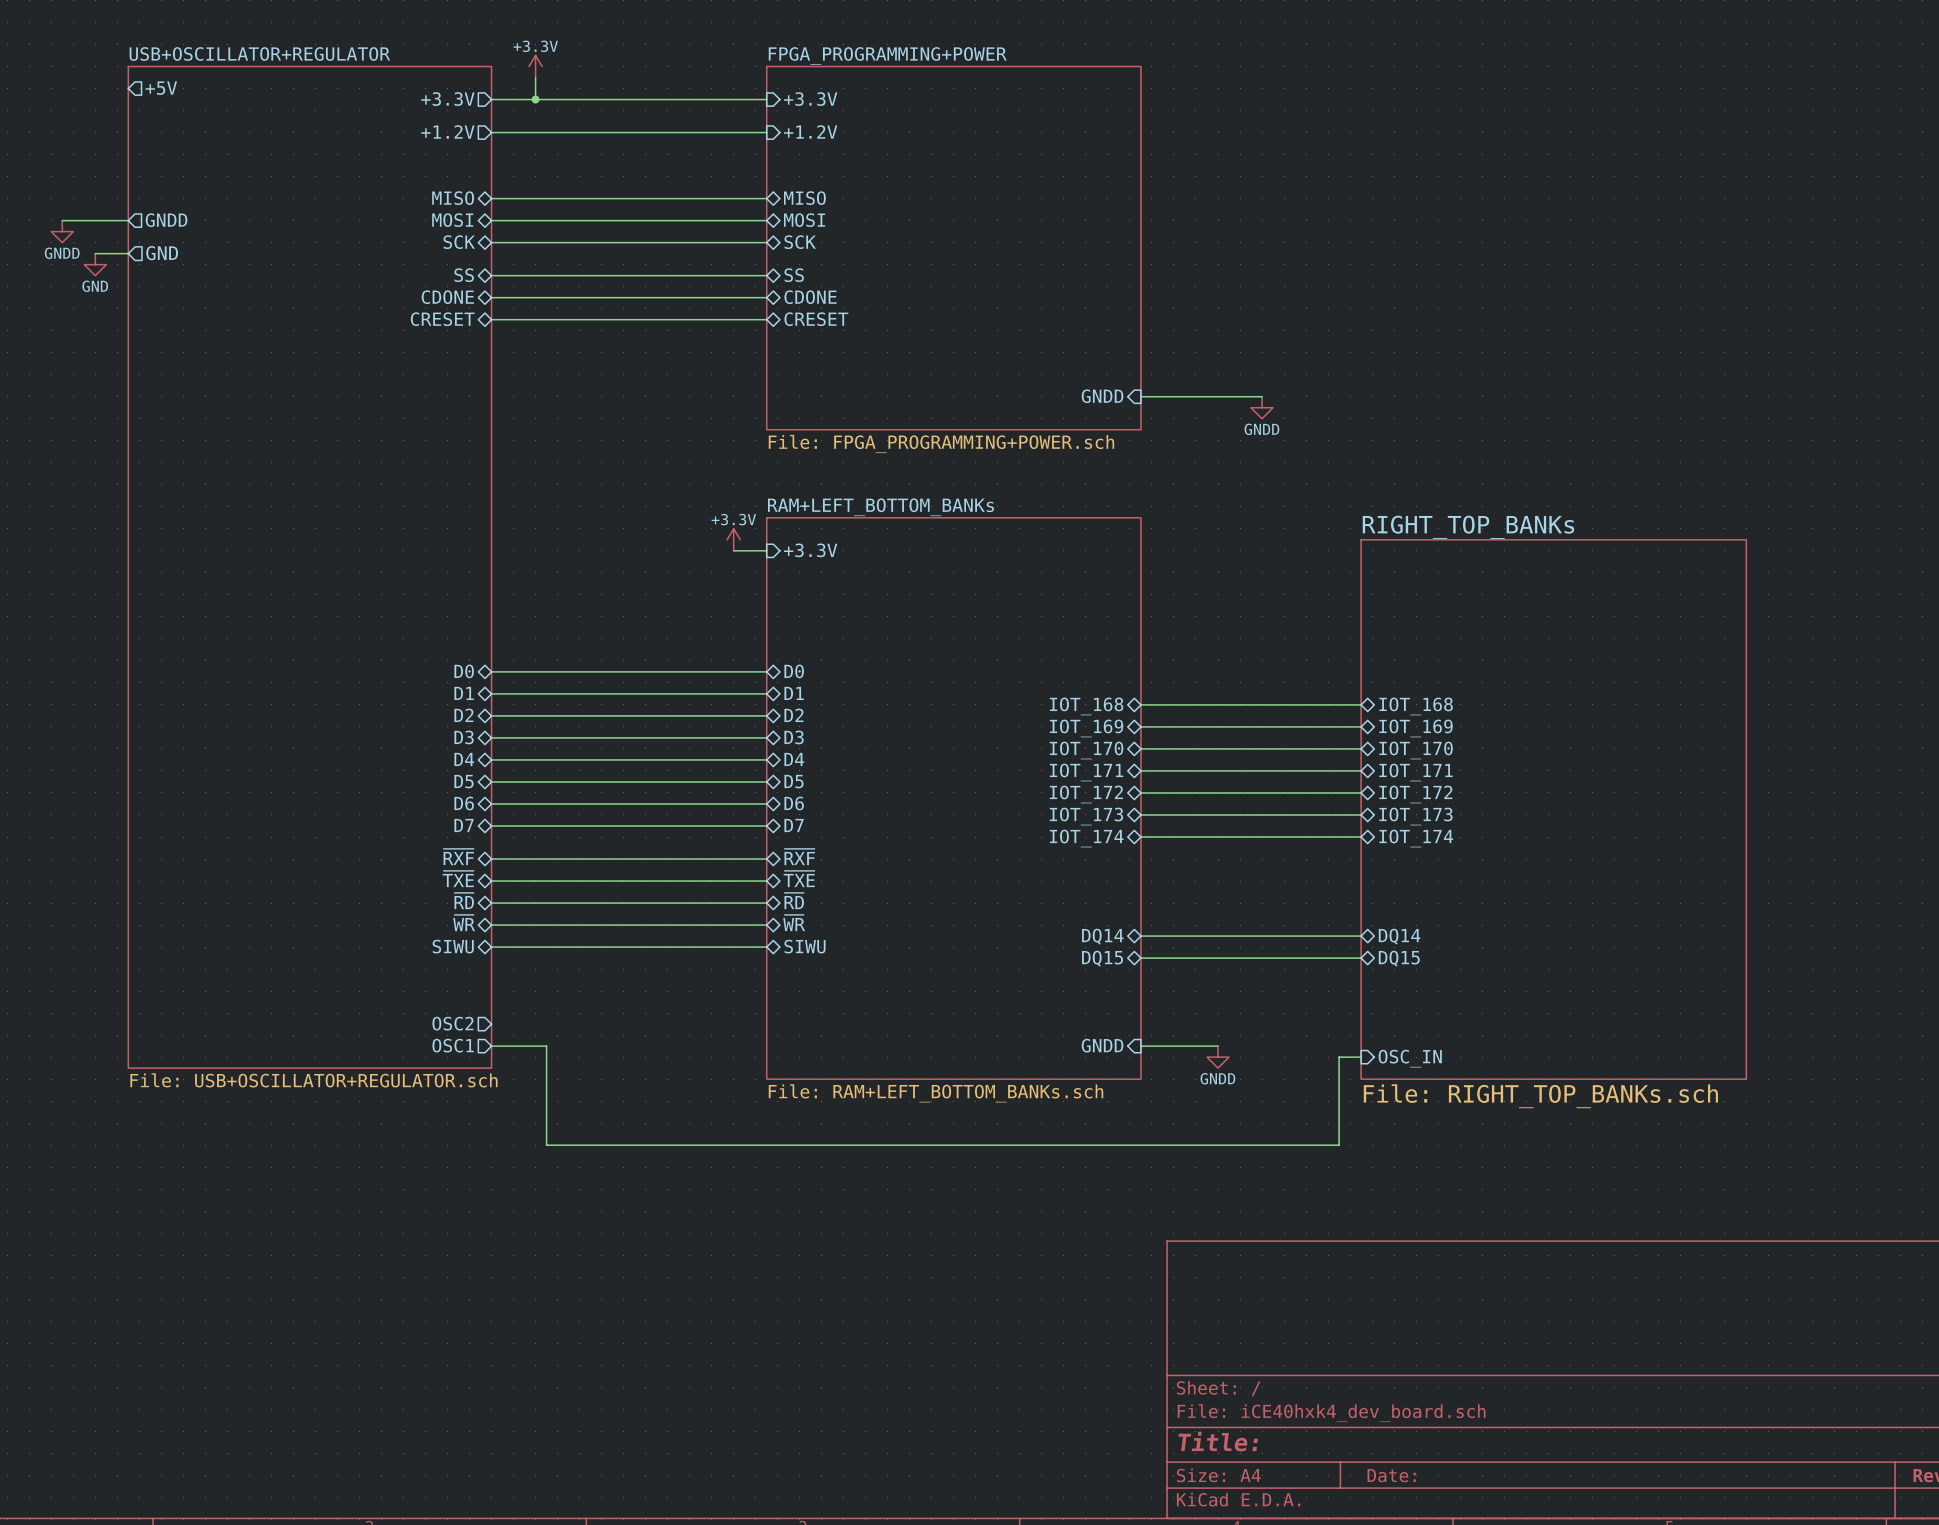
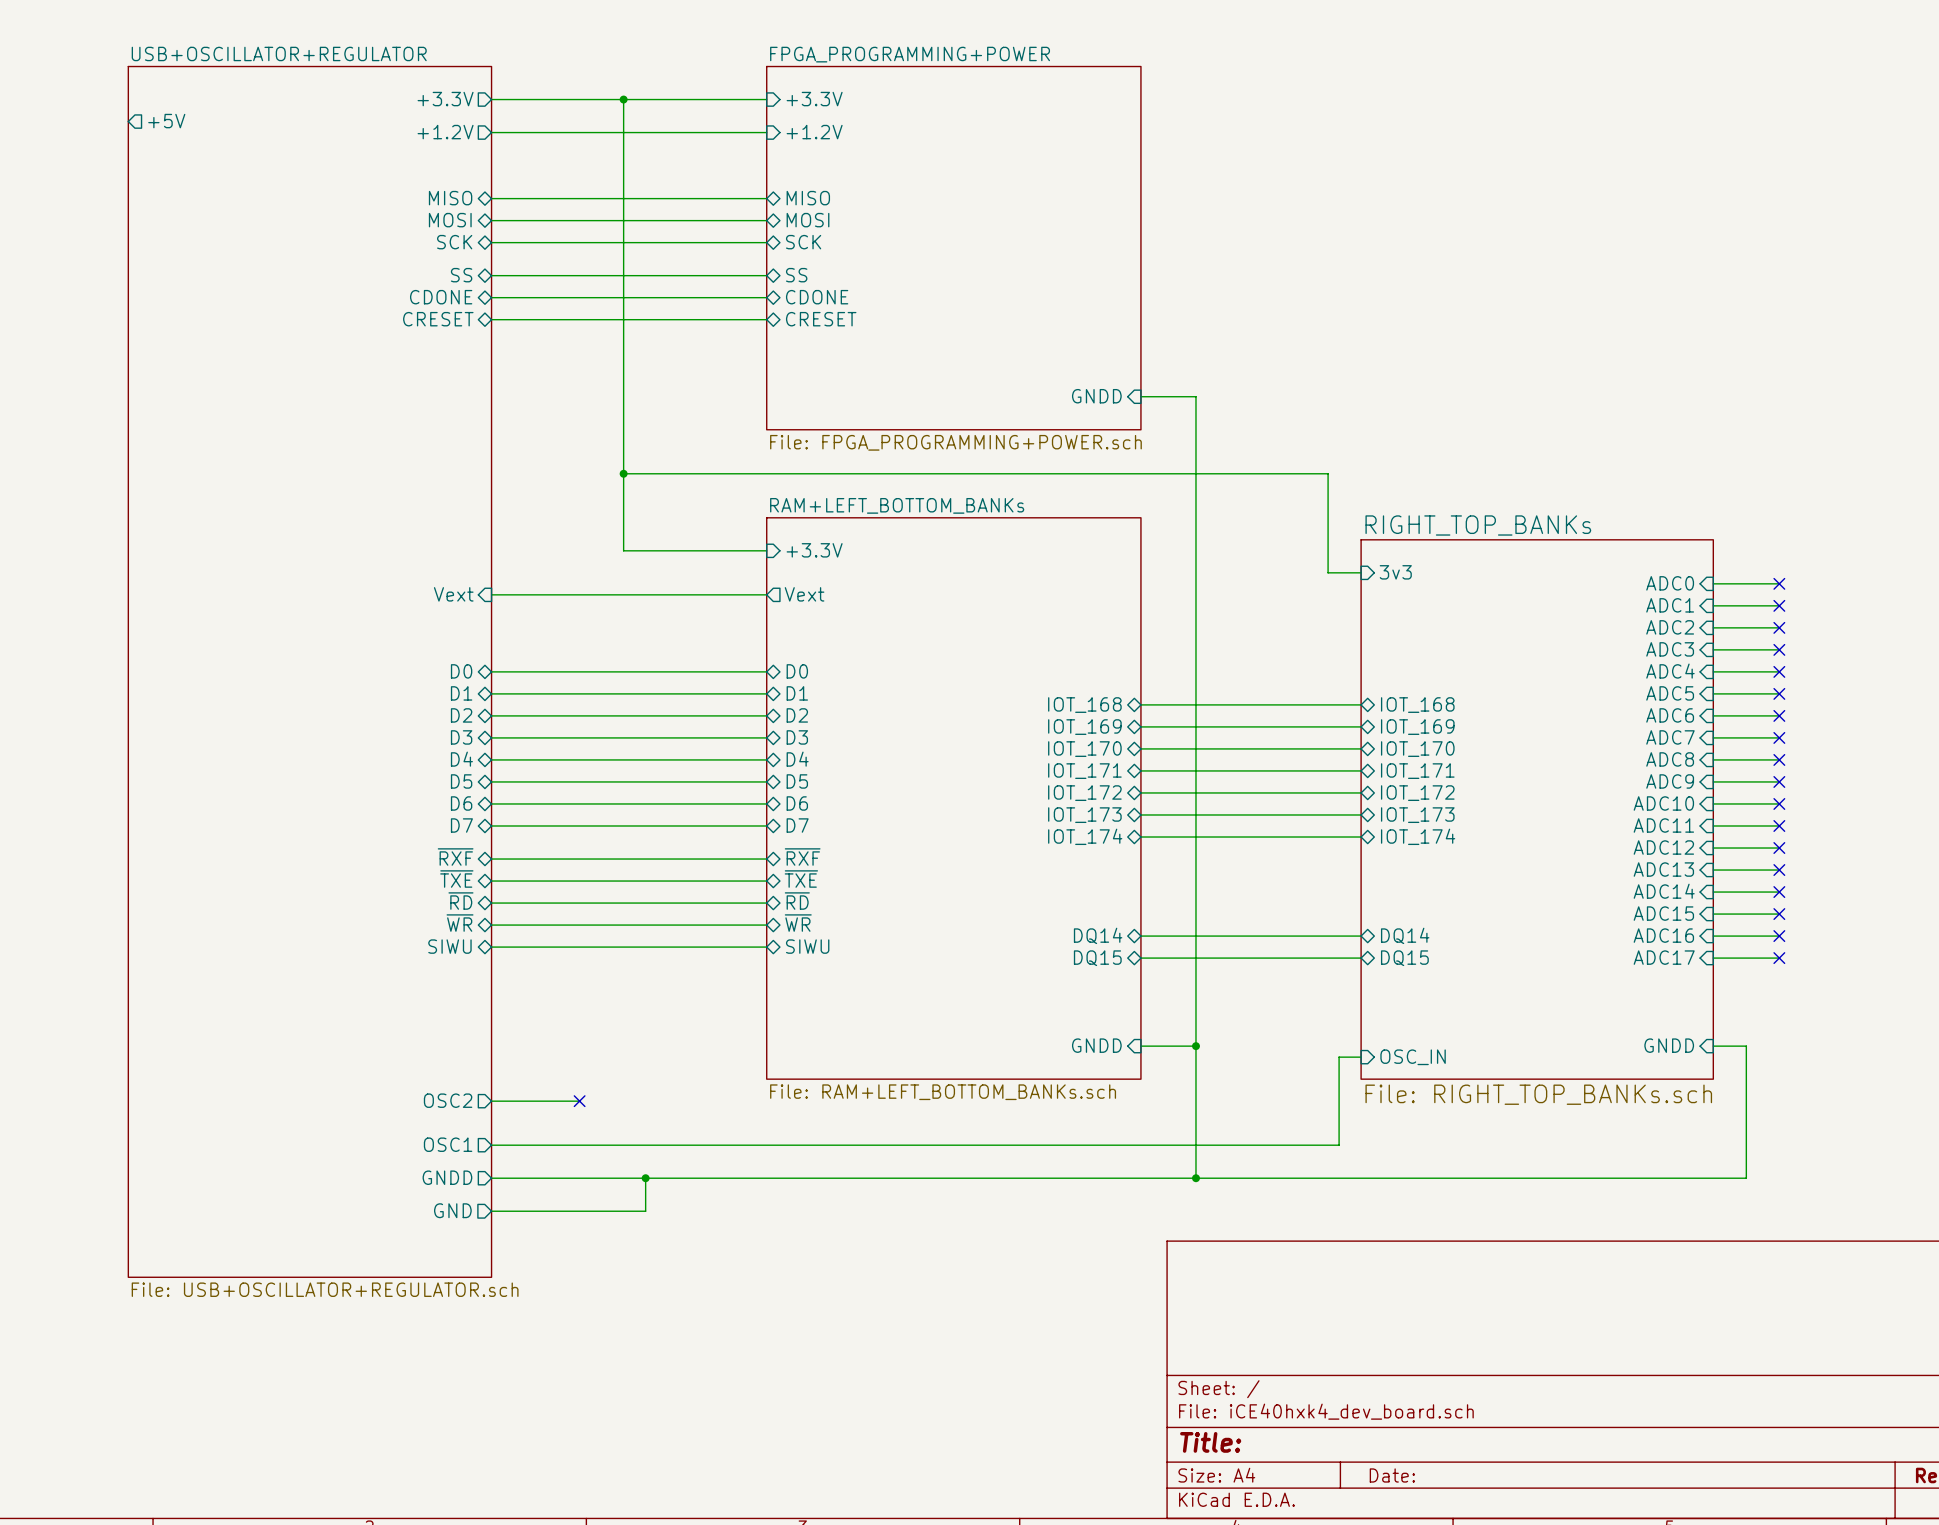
power symbol: +3.3V (535, 66) -> none
wire: (535, 77) (535, 99) -> none
sheet pin position: +5V (161, 88) -> +5V (166, 121)
junction: (535, 99) -> none
wire: none -> (623, 99) (623, 550) (733, 550)
junction: none -> (623, 99)
wire: (62, 220) (128, 220) -> none
sheet pin: GNDD (166, 220) -> none
power symbol: GNDD (62, 231) -> none
wire: (95, 253) (128, 253) -> none
sheet pin: GND (162, 253) -> none
power symbol: GND (95, 264) -> none
wire: (1195, 396) (1262, 396) -> (1195, 396) (1195, 1178)
power symbol: GNDD (1262, 407) -> none
wire: none -> (623, 473) (1328, 473) (1328, 572) (1361, 572)
junction: none -> (623, 473)
power symbol: +3.3V (733, 539) -> none
sheet USB+OSCILLATOR+REGULATOR: File: USB+OSCILLATOR+REGULATOR.sch (309, 567) -> none
sheet pin: none -> 3v3 (1395, 572)
sheet pin: none -> ADC0 (1670, 583)
wire: none -> (1713, 583) (1779, 583)
no-connect mark: none -> (1779, 583)
sheet pin: none -> Vext (453, 594)
wire: none -> (491, 594) (766, 594)
sheet pin: none -> Vext (804, 594)
sheet pin: none -> ADC1 (1670, 605)
wire: none -> (1713, 605) (1779, 605)
no-connect mark: none -> (1779, 605)
sheet pin: none -> ADC2 (1670, 627)
wire: none -> (1713, 627) (1779, 627)
no-connect mark: none -> (1779, 627)
sheet pin: none -> ADC3 (1670, 649)
wire: none -> (1713, 649) (1779, 649)
no-connect mark: none -> (1779, 649)
sheet USB+OSCILLATOR+REGULATOR: none -> File: USB+OSCILLATOR+REGULATOR.sch (309, 671)
sheet pin: none -> ADC4 (1670, 671)
wire: none -> (1713, 671) (1779, 671)
no-connect mark: none -> (1779, 671)
sheet pin: none -> ADC5 (1670, 693)
wire: none -> (1713, 693) (1779, 693)
no-connect mark: none -> (1779, 693)
sheet pin: none -> ADC6 (1670, 715)
wire: none -> (1713, 715) (1779, 715)
no-connect mark: none -> (1779, 715)
sheet pin: none -> ADC7 (1670, 737)
wire: none -> (1713, 737) (1779, 737)
no-connect mark: none -> (1779, 737)
sheet pin: none -> ADC8 (1670, 759)
wire: none -> (1713, 759) (1779, 759)
no-connect mark: none -> (1779, 759)
sheet pin: none -> ADC9 (1670, 781)
wire: none -> (1713, 781) (1779, 781)
no-connect mark: none -> (1779, 781)
sheet pin: none -> ADC10 (1663, 803)
wire: none -> (1713, 803) (1779, 803)
no-connect mark: none -> (1779, 803)
sheet RIGHT_TOP_BANKs: none -> File: RIGHT_TOP_BANKs.sch (1537, 809)
sheet RIGHT_TOP_BANKs: File: RIGHT_TOP_BANKs.sch (1553, 809) -> none
sheet pin: none -> ADC11 (1663, 825)
wire: none -> (1713, 825) (1779, 825)
no-connect mark: none -> (1779, 825)
sheet pin: none -> ADC12 (1663, 847)
wire: none -> (1713, 848) (1779, 848)
no-connect mark: none -> (1779, 848)
sheet pin: none -> ADC13 (1663, 869)
wire: none -> (1713, 870) (1779, 870)
no-connect mark: none -> (1779, 870)
sheet pin: none -> ADC14 (1664, 891)
wire: none -> (1713, 892) (1779, 892)
no-connect mark: none -> (1779, 892)
sheet pin: none -> ADC15 (1663, 913)
wire: none -> (1713, 914) (1779, 914)
no-connect mark: none -> (1779, 914)
sheet pin: none -> ADC16 (1663, 935)
wire: none -> (1713, 936) (1779, 936)
no-connect mark: none -> (1779, 936)
sheet pin: none -> ADC17 (1664, 957)
wire: none -> (1713, 958) (1779, 958)
no-connect mark: none -> (1779, 958)
sheet pin position: OSC2 (452, 1023) -> OSC2 (448, 1100)
sheet pin position: OSC1 (453, 1045) -> OSC1 (448, 1144)
sheet pin: none -> GNDD (1669, 1045)
wire: (491, 1046) (546, 1046) (546, 1145) -> (491, 1145) (546, 1145)
wire: (1195, 1046) (1218, 1046) -> none
junction: none -> (1195, 1046)
wire: none -> (1713, 1046) (1746, 1046) (1746, 1178) (491, 1178)
power symbol: GNDD (1218, 1057) -> none
wire: none -> (491, 1101) (579, 1101)
no-connect mark: none -> (579, 1101)
sheet pin: none -> GNDD (447, 1177)
wire: none -> (645, 1178) (645, 1211) (491, 1211)
junction: none -> (645, 1178)
junction: none -> (1195, 1178)
sheet pin: none -> GND (452, 1210)

